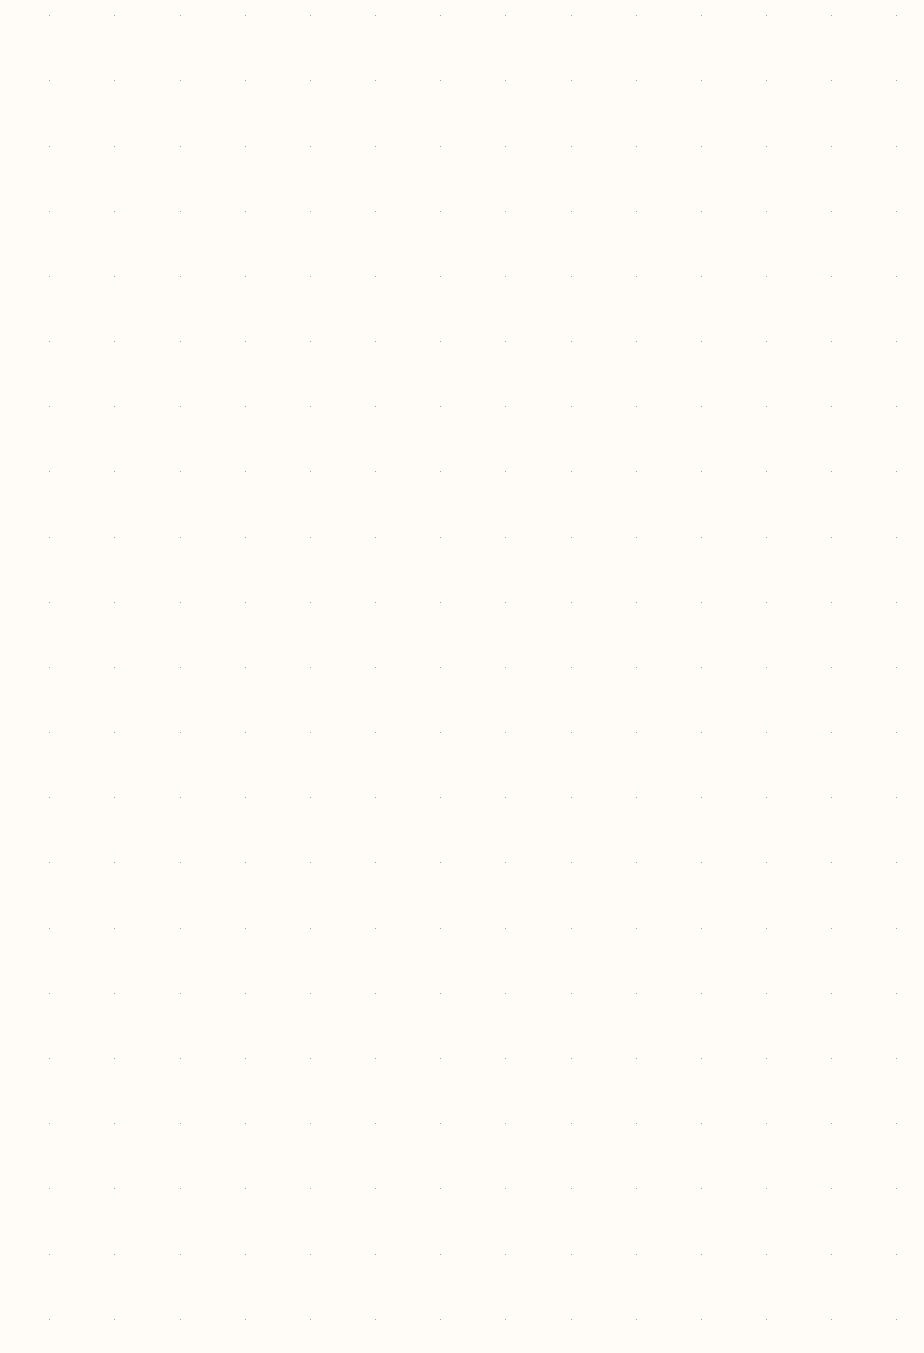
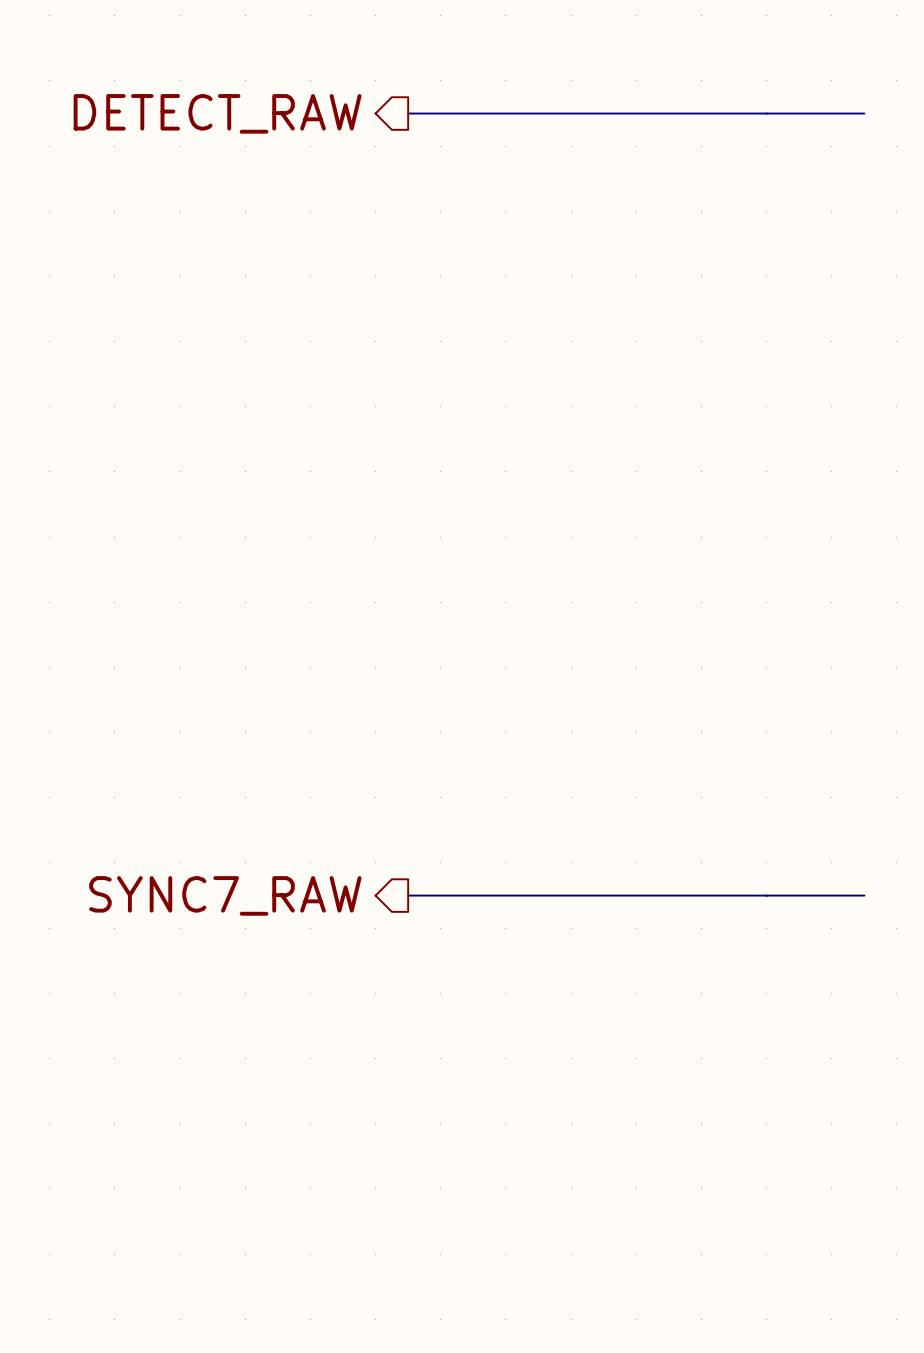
hierarchical label: none -> DETECT_RAW (217, 113)
wire: none -> (408, 113) (864, 113)
hierarchical label: none -> SYNC7_RAW (225, 895)
wire: none -> (408, 895) (864, 895)

